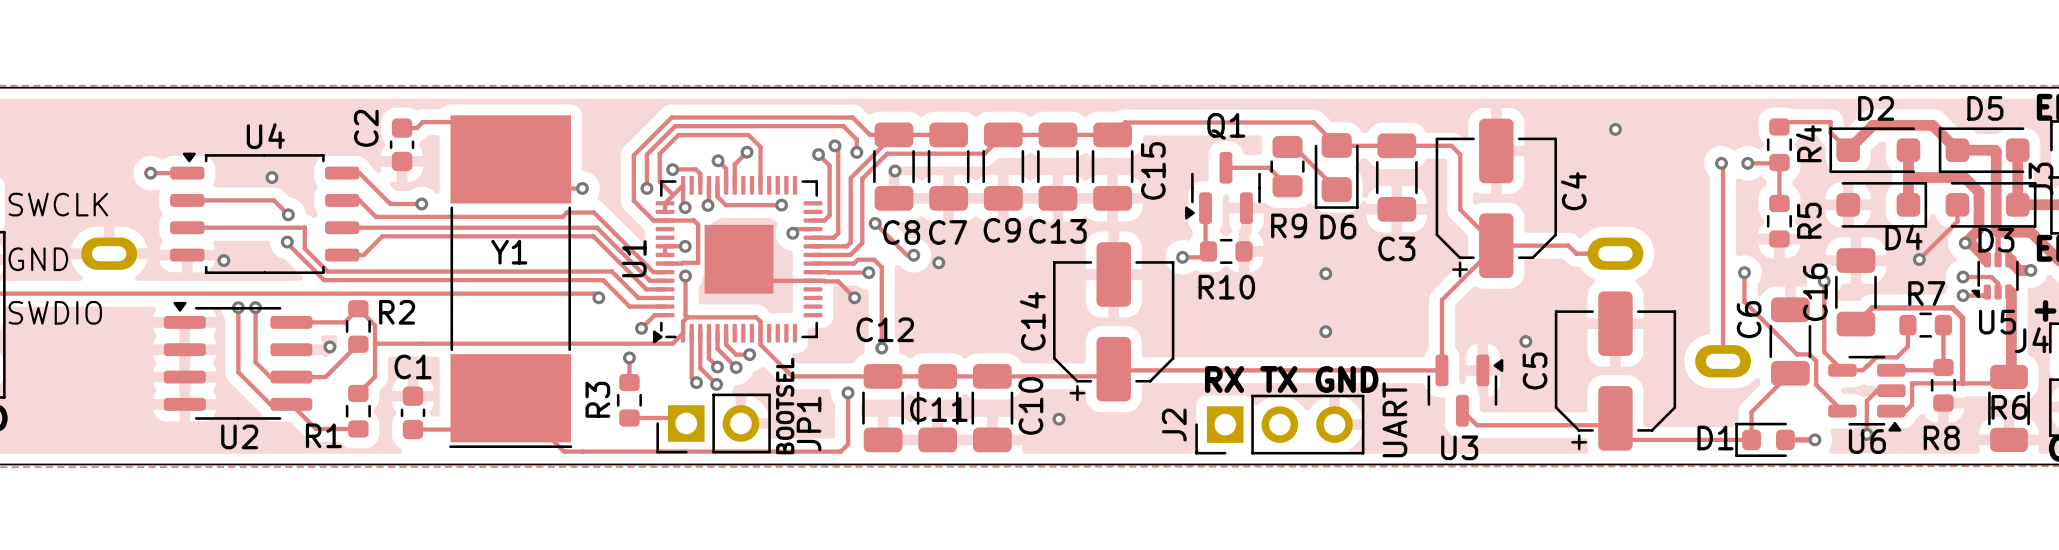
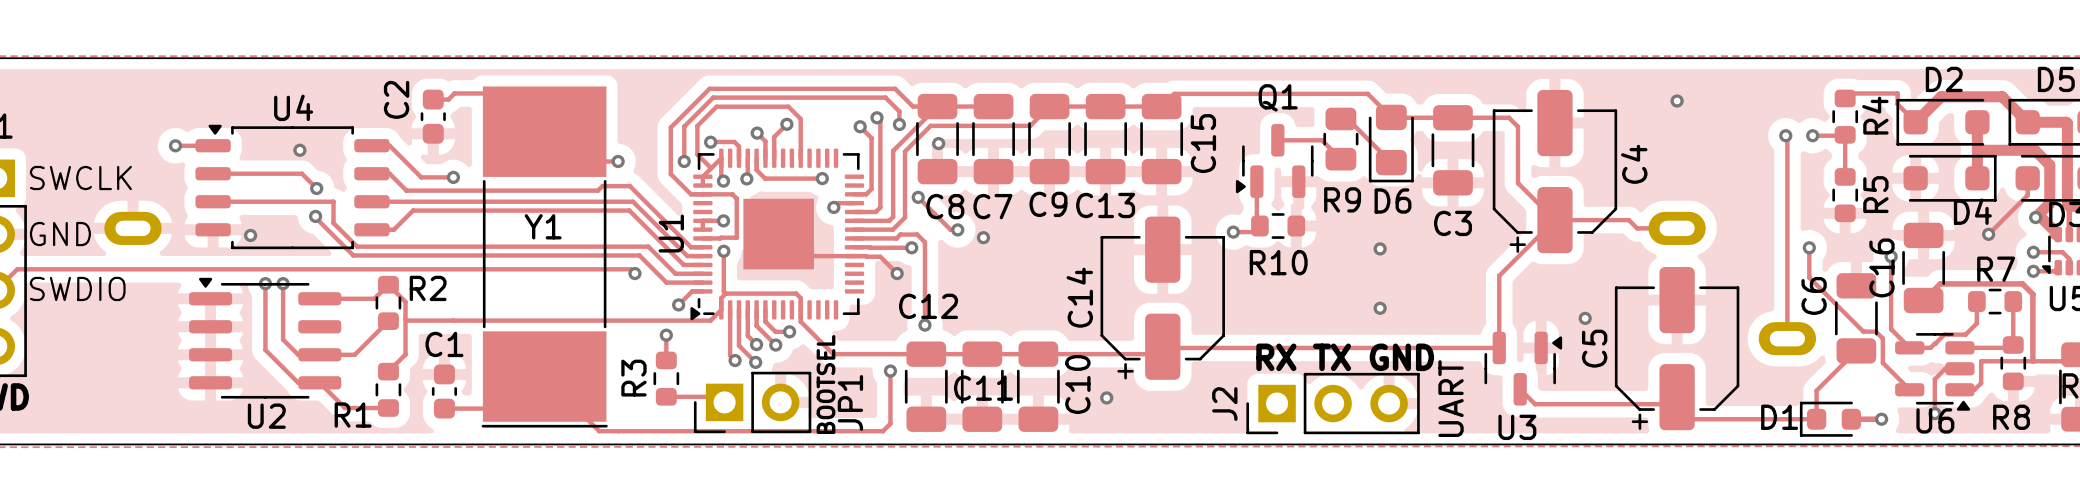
via: (329, 346) -> none

